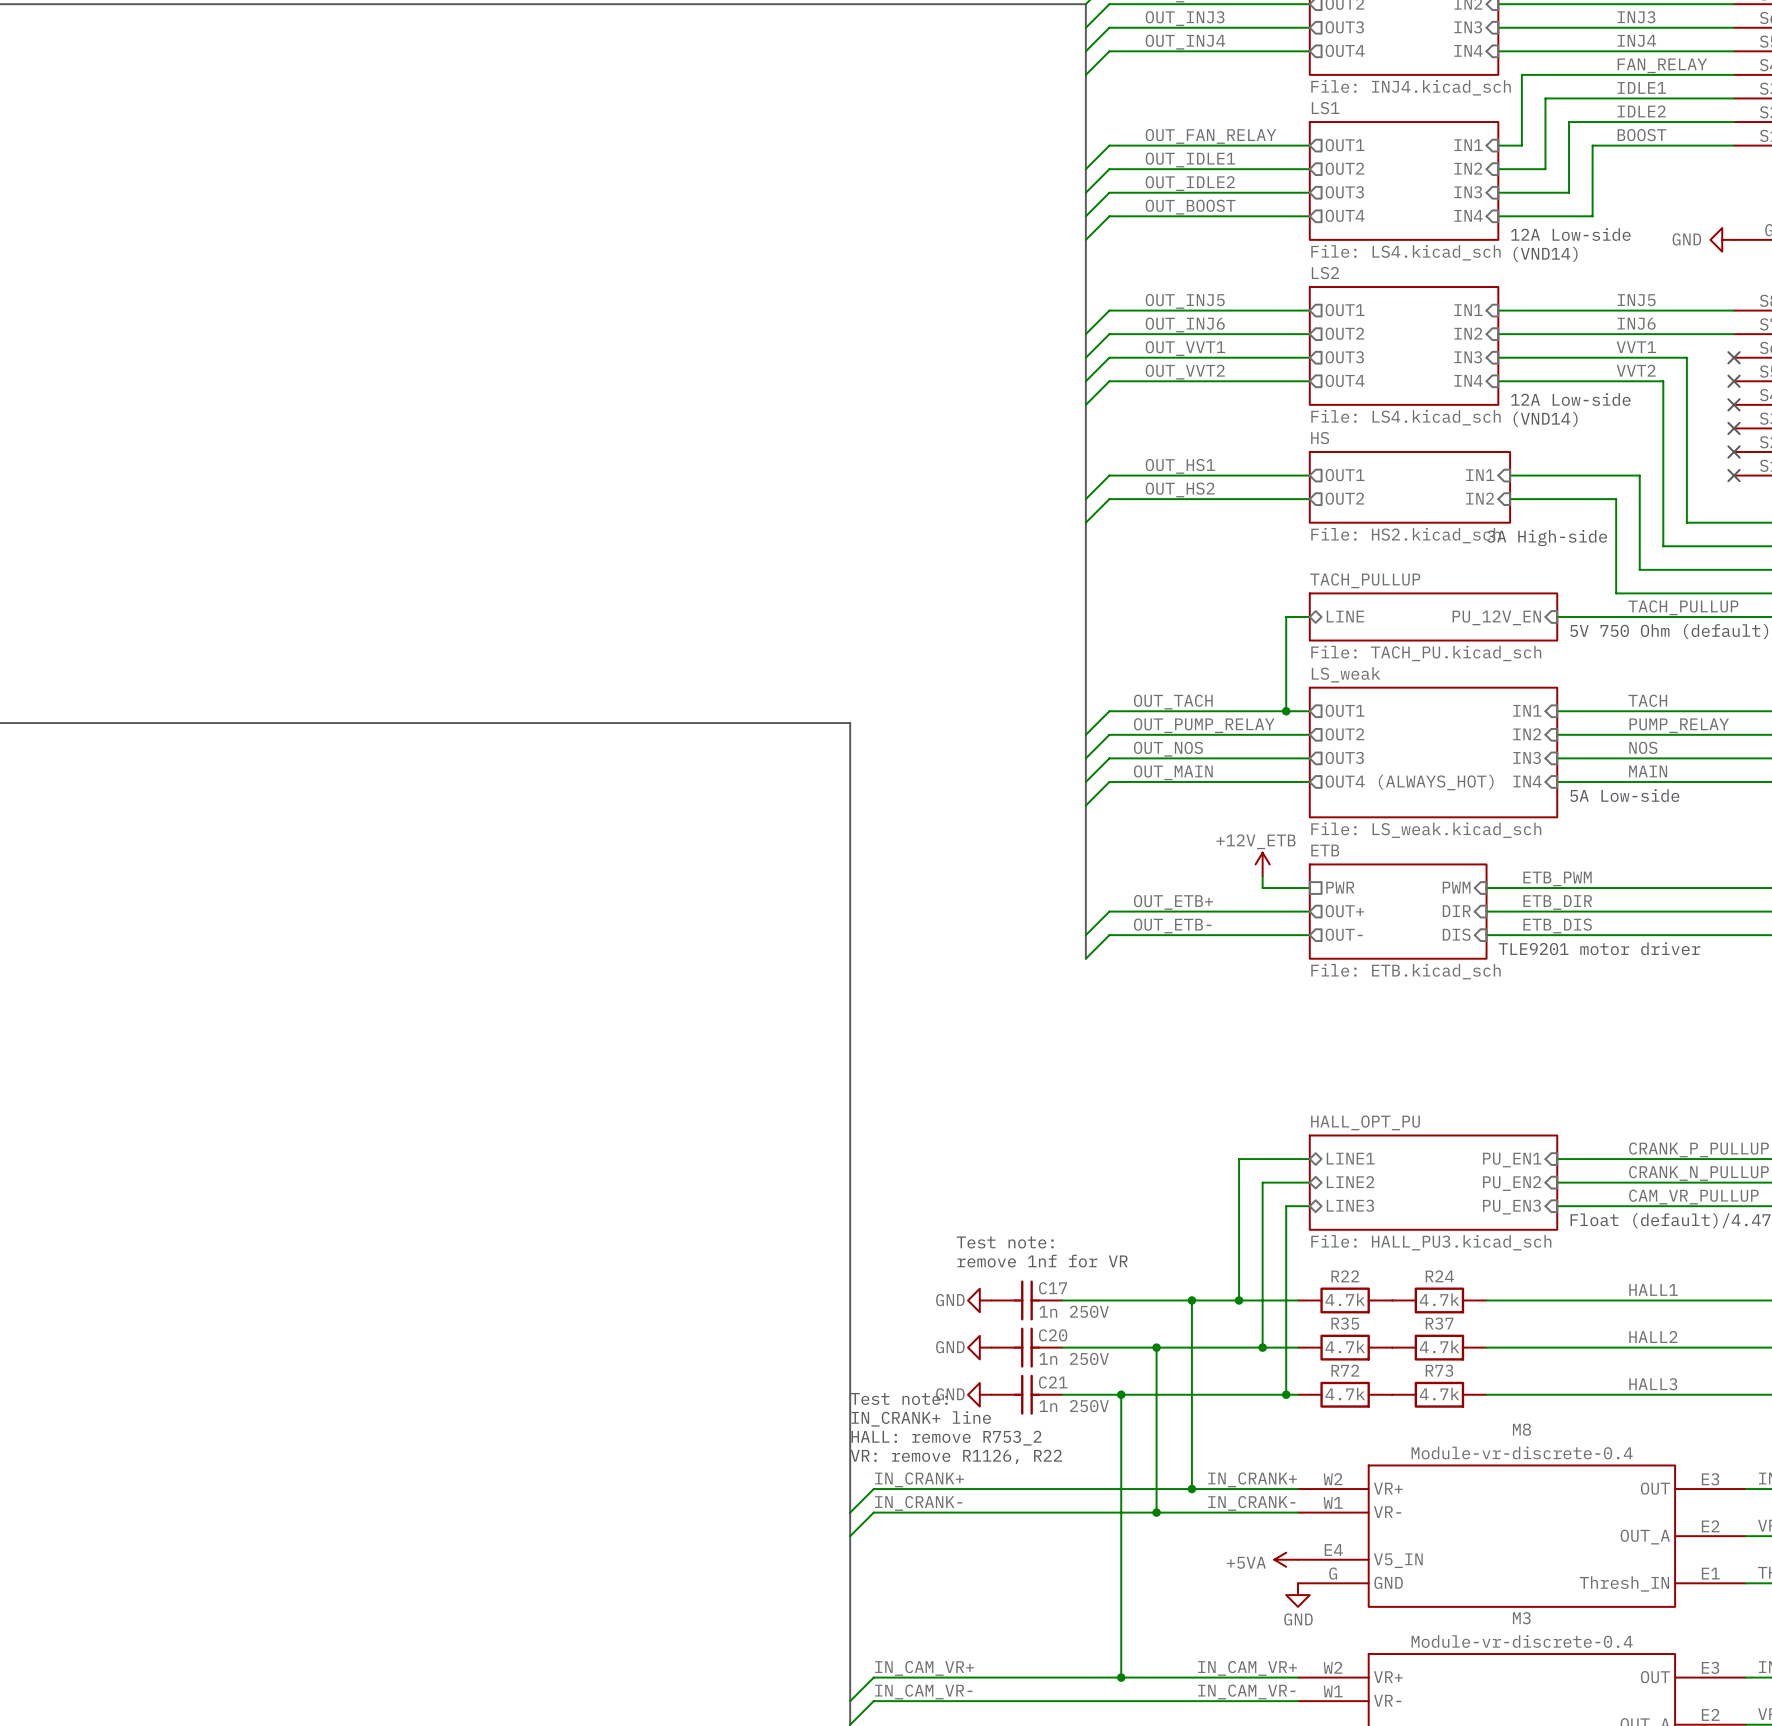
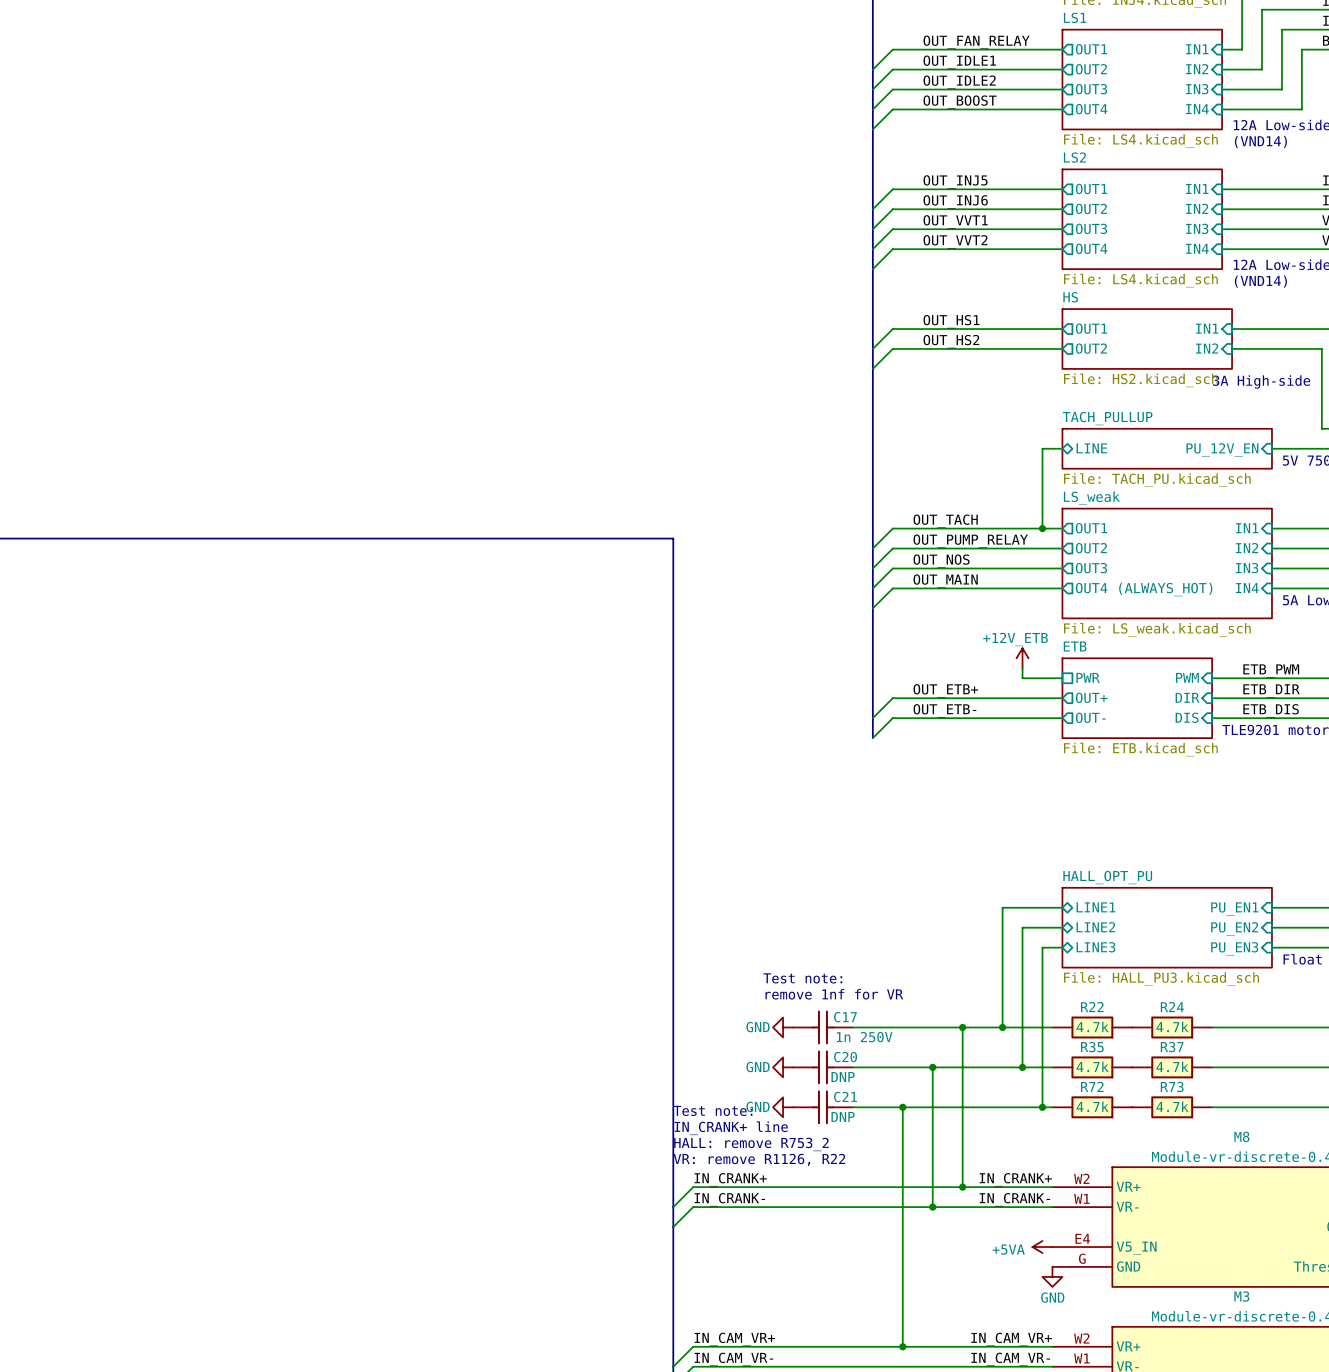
C20 text: none -> DNP (843, 1077)
C20 value: 1n 250V (1074, 1358) -> none
C21 text: none -> DNP (843, 1116)
C21 value: 1n 250V (1074, 1406) -> none

